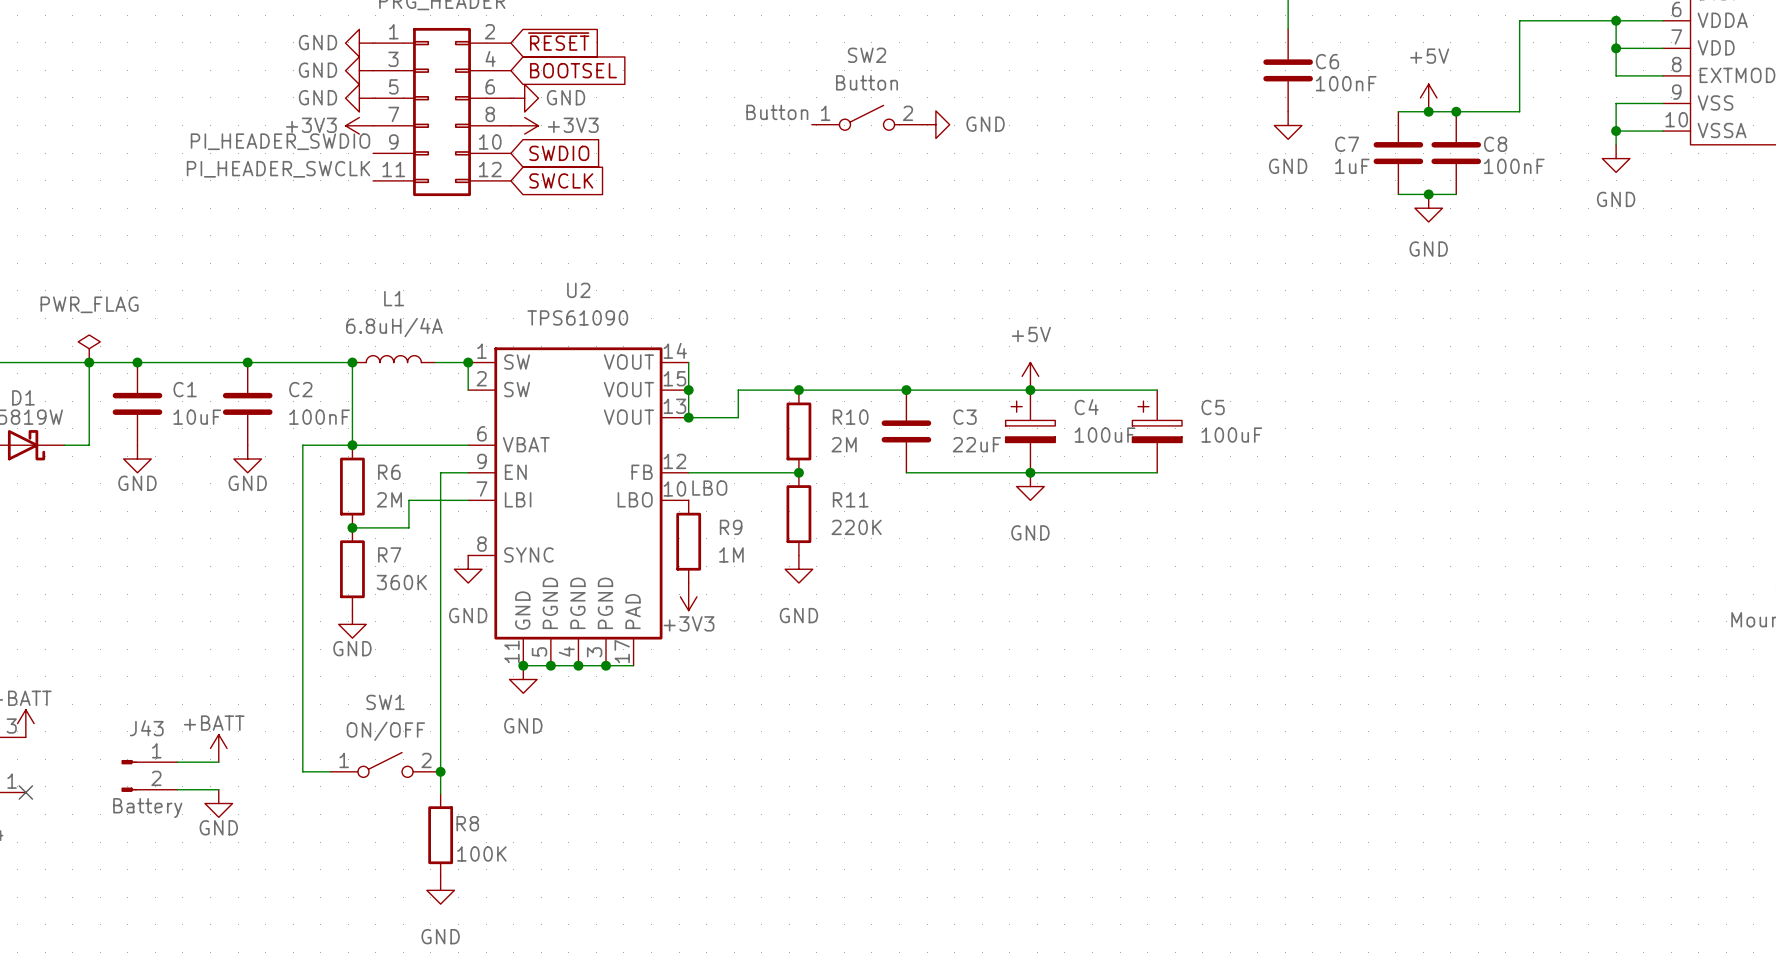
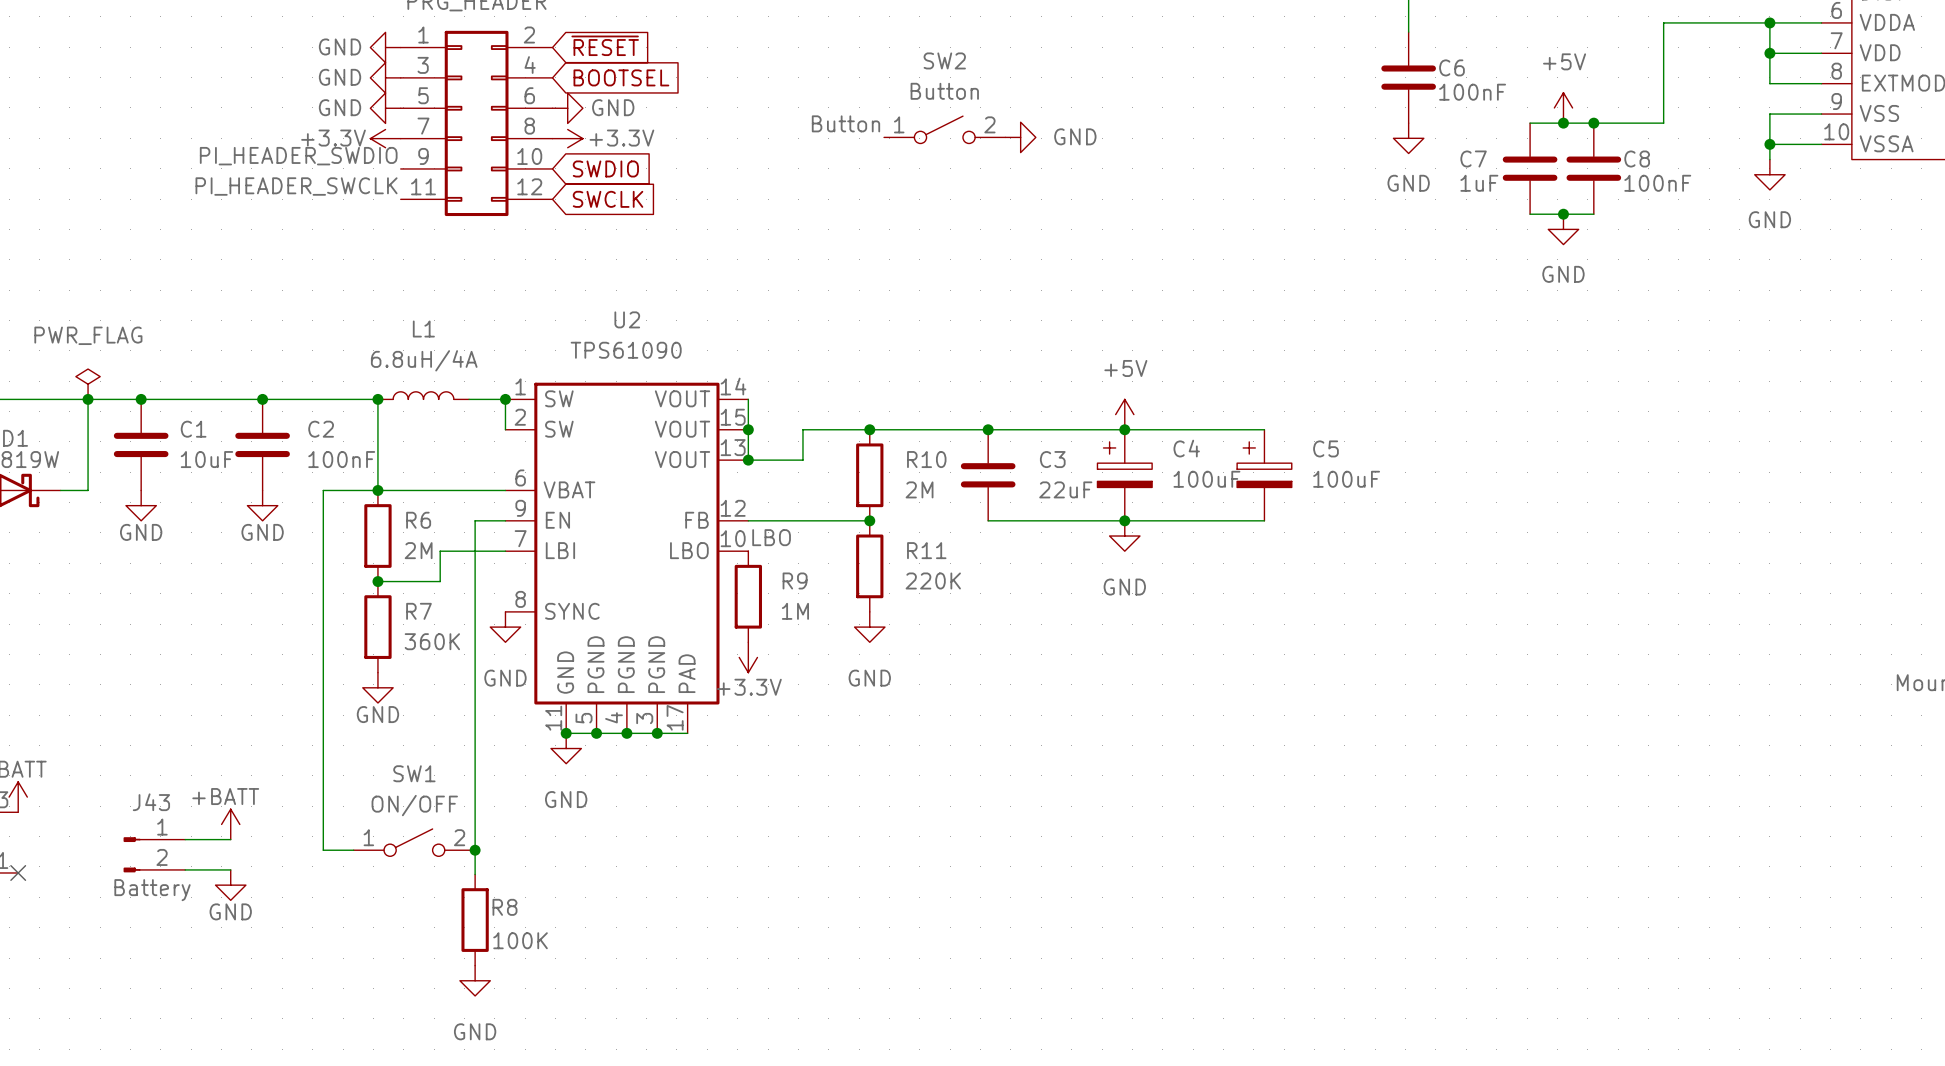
power symbol: +3V3 (359, 125) -> +3.3V (385, 138)
power symbol: +3V3 (524, 125) -> +3.3V (567, 138)
power symbol: +3V3 (688, 596) -> +3.3V (748, 657)

